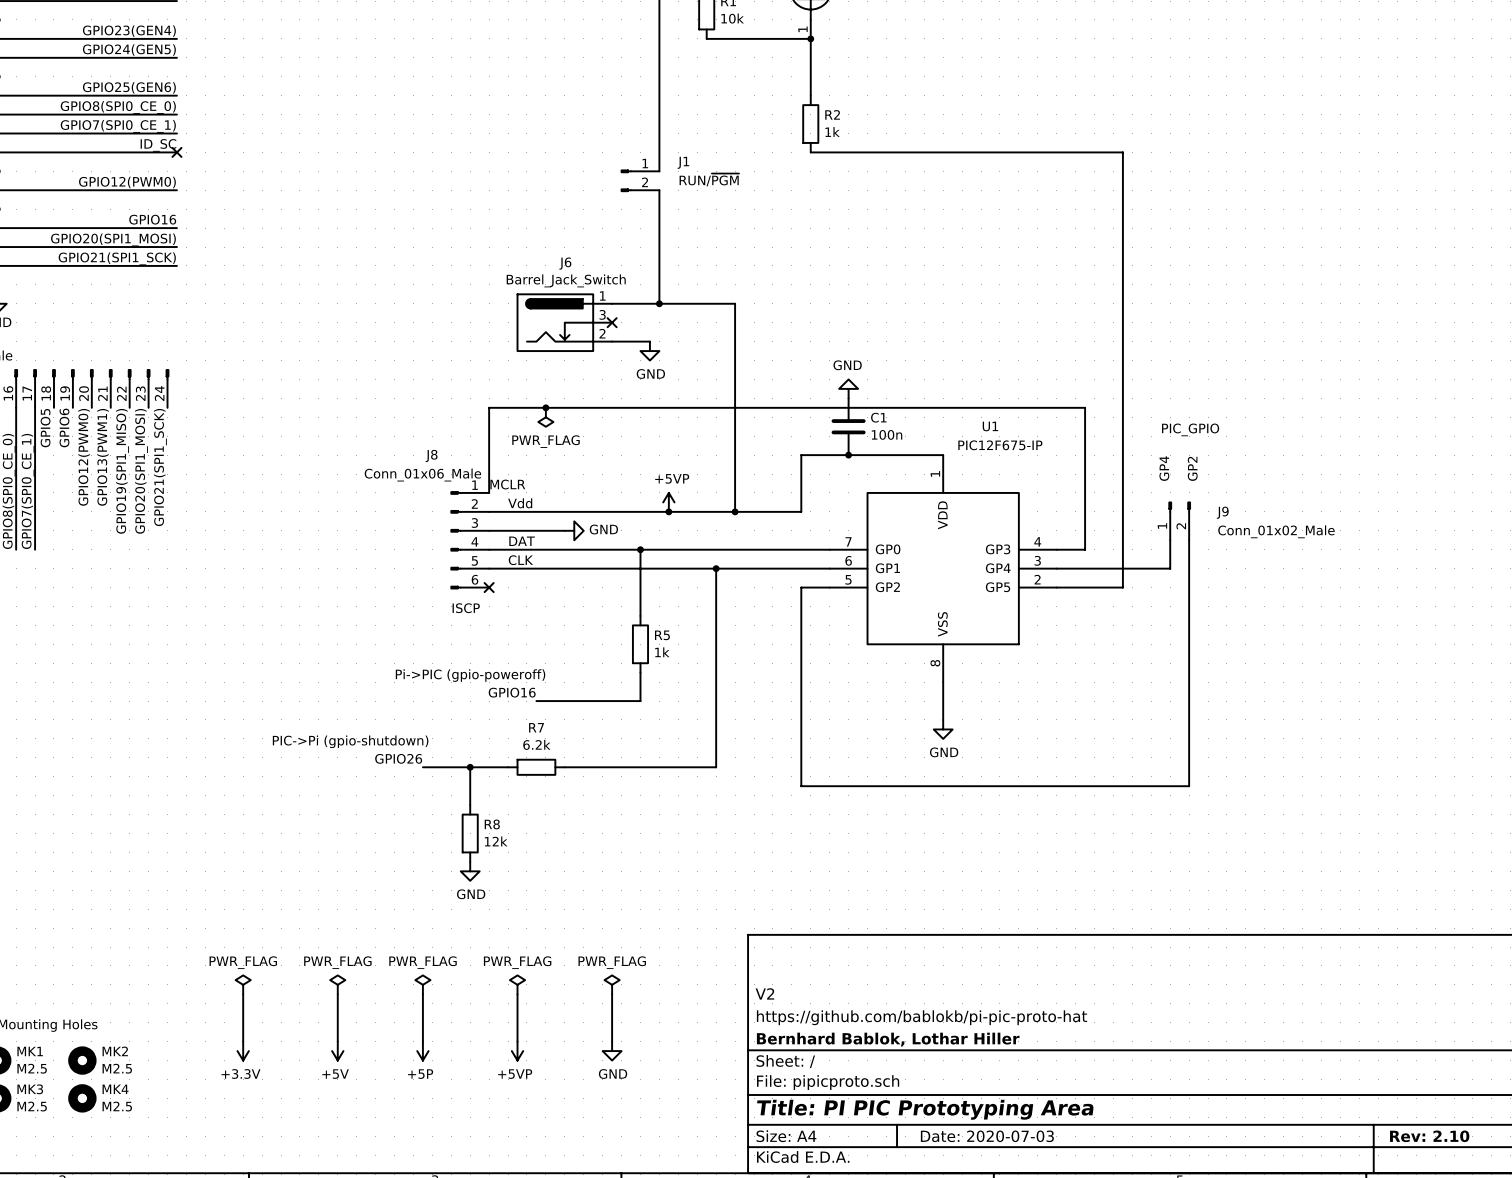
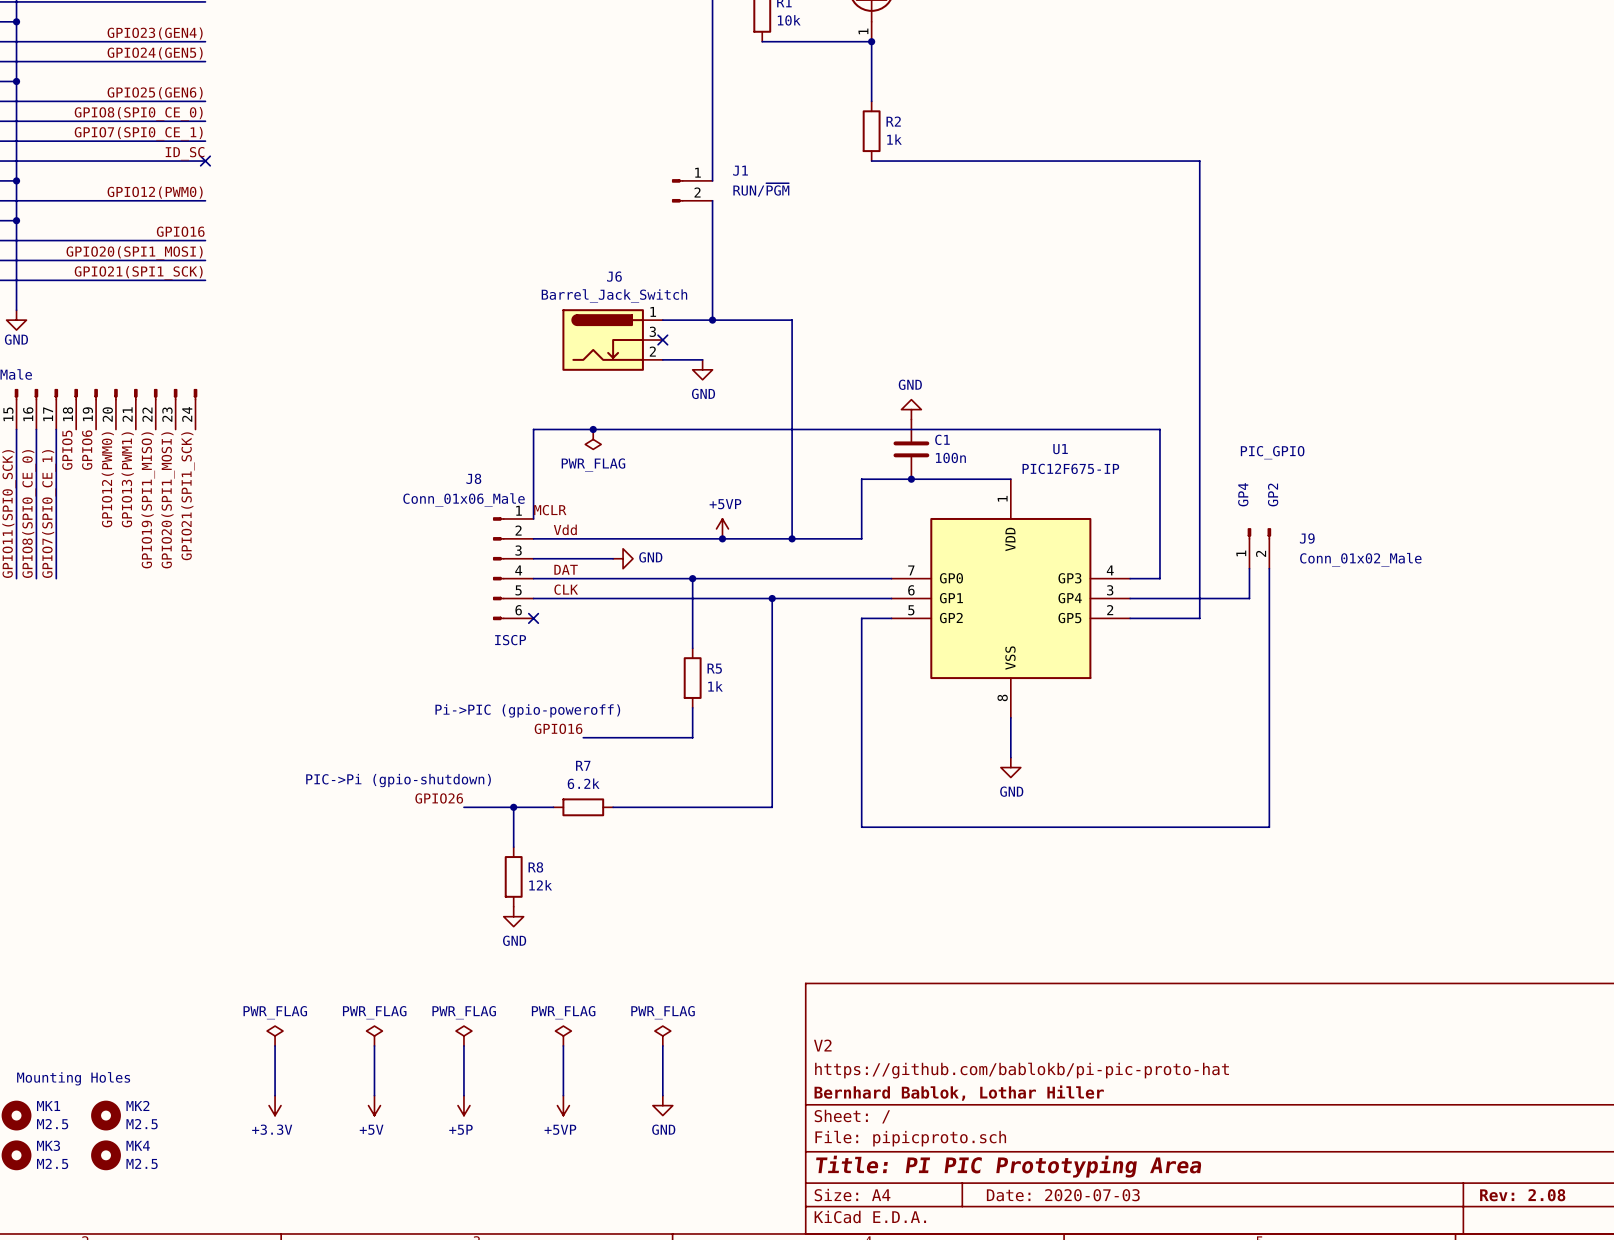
title block: Rev: 2.10 (1429, 1136) -> Rev: 2.08 (1522, 1195)

